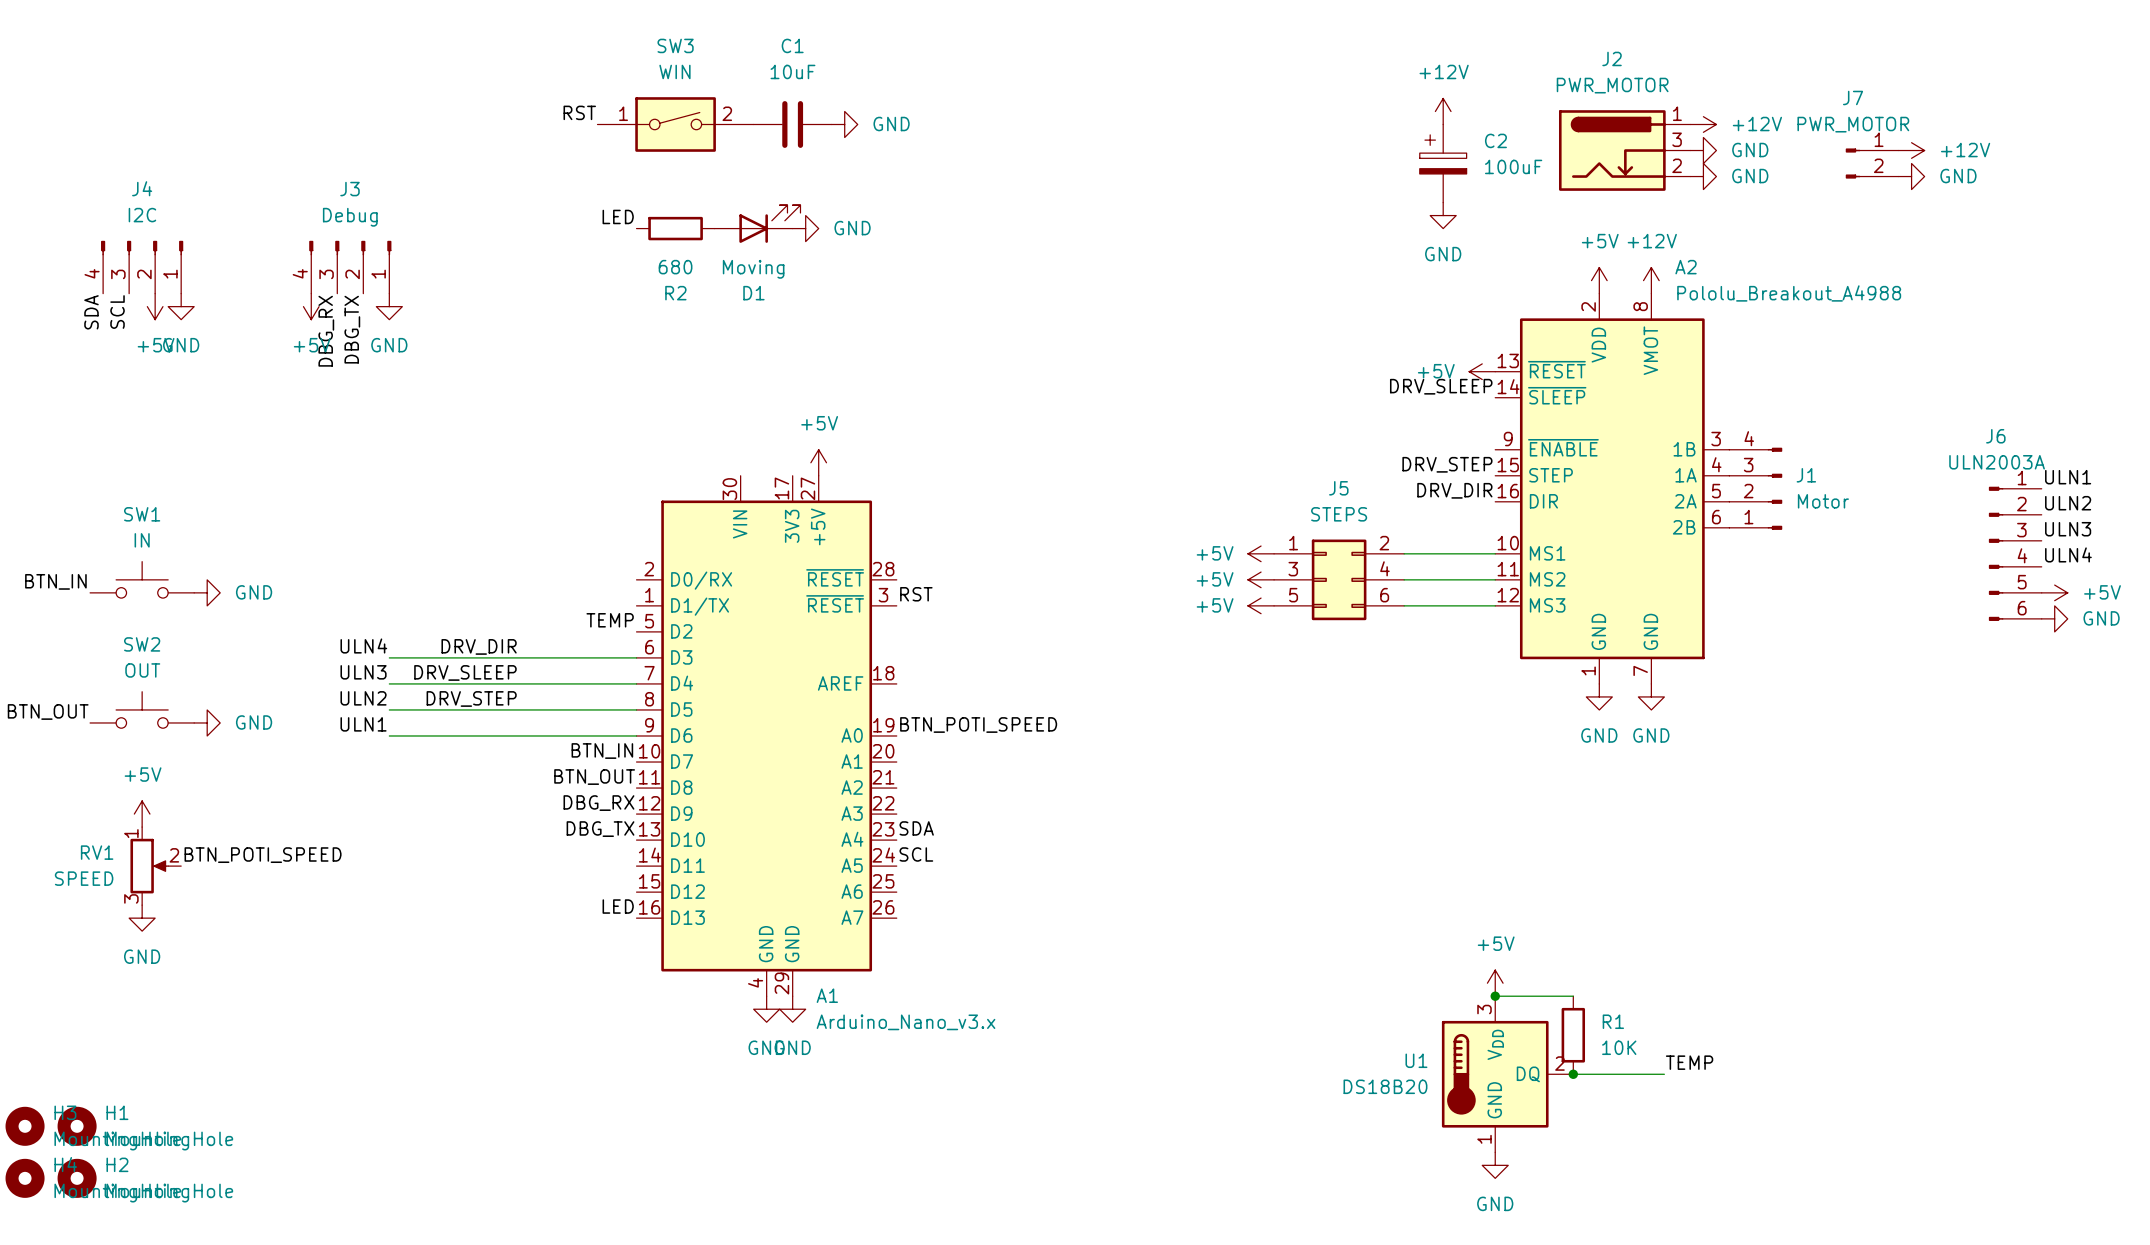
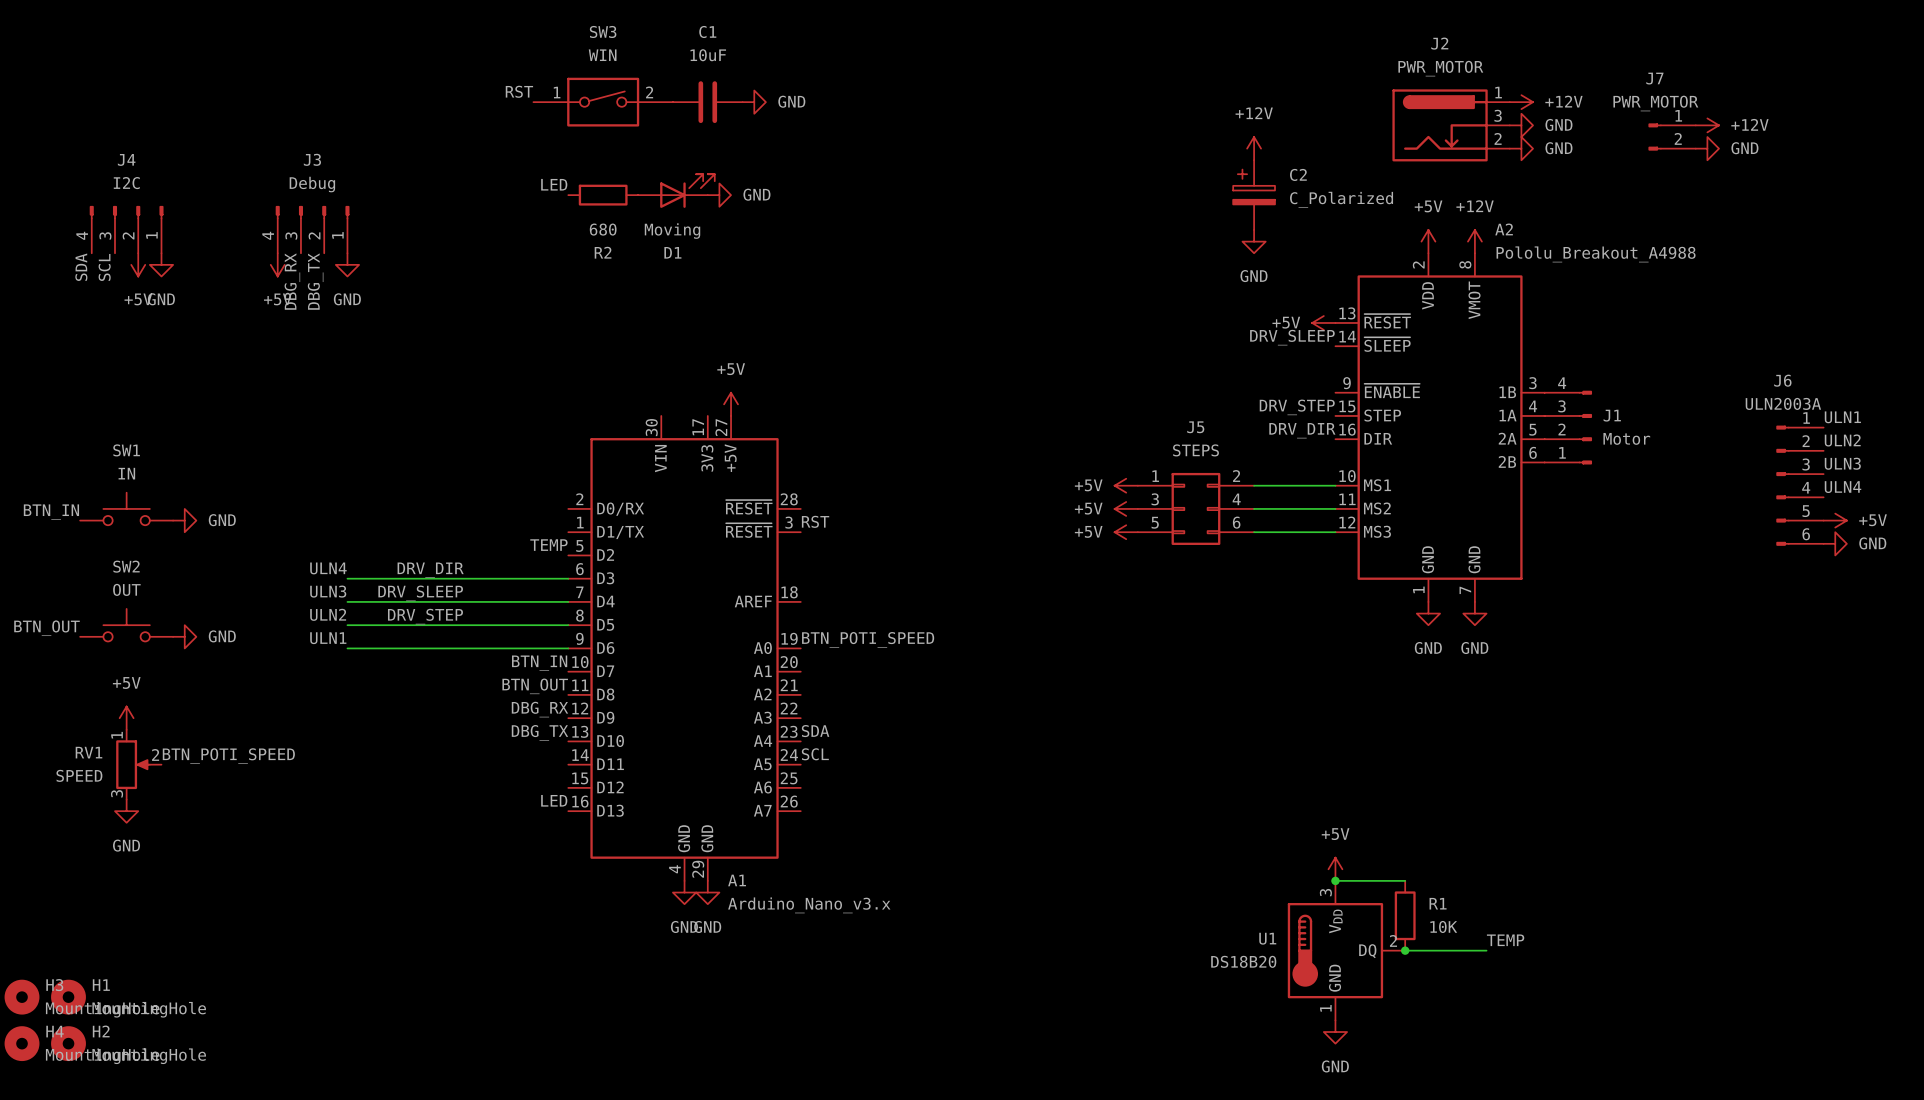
power symbol position: +12V (1443, 111) -> +12V (1254, 148)
C2 position: (1443, 163) -> (1254, 195)
C2 value: 100uF (1513, 166) -> C_Polarized (1341, 199)
power symbol position: GND (1443, 215) -> GND (1254, 241)

